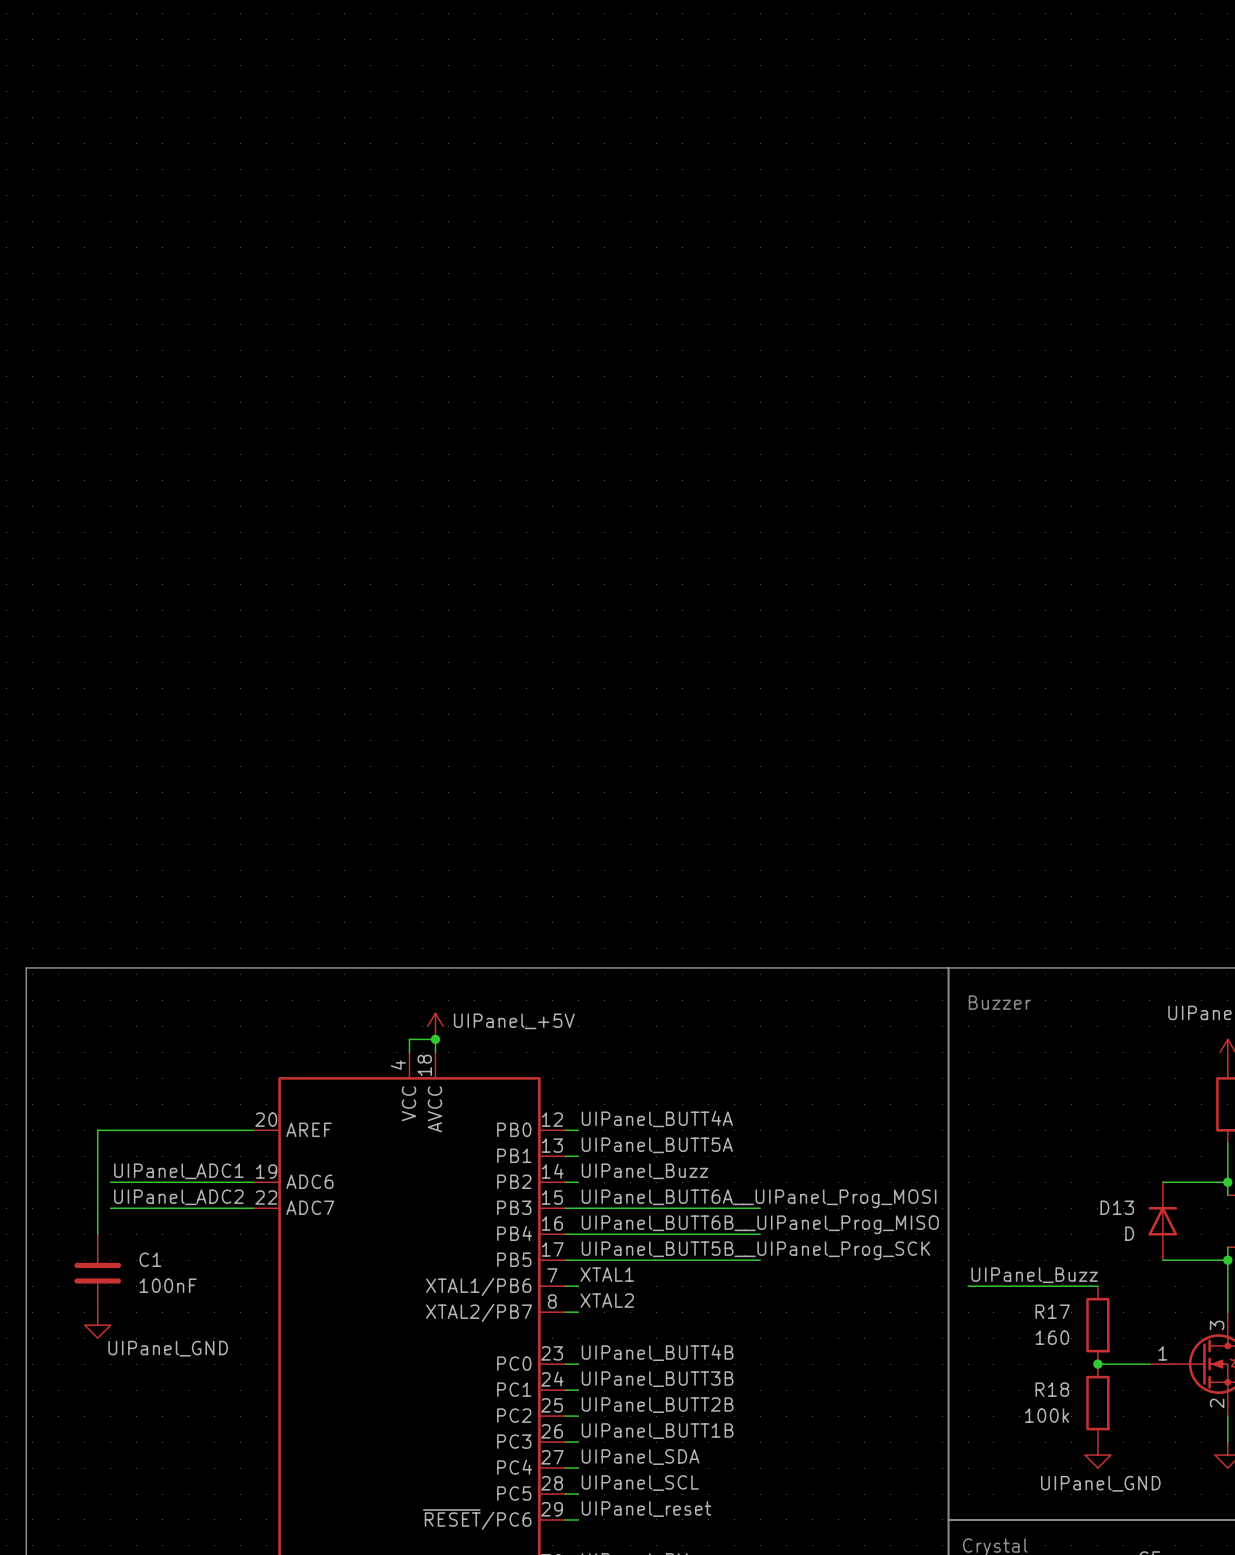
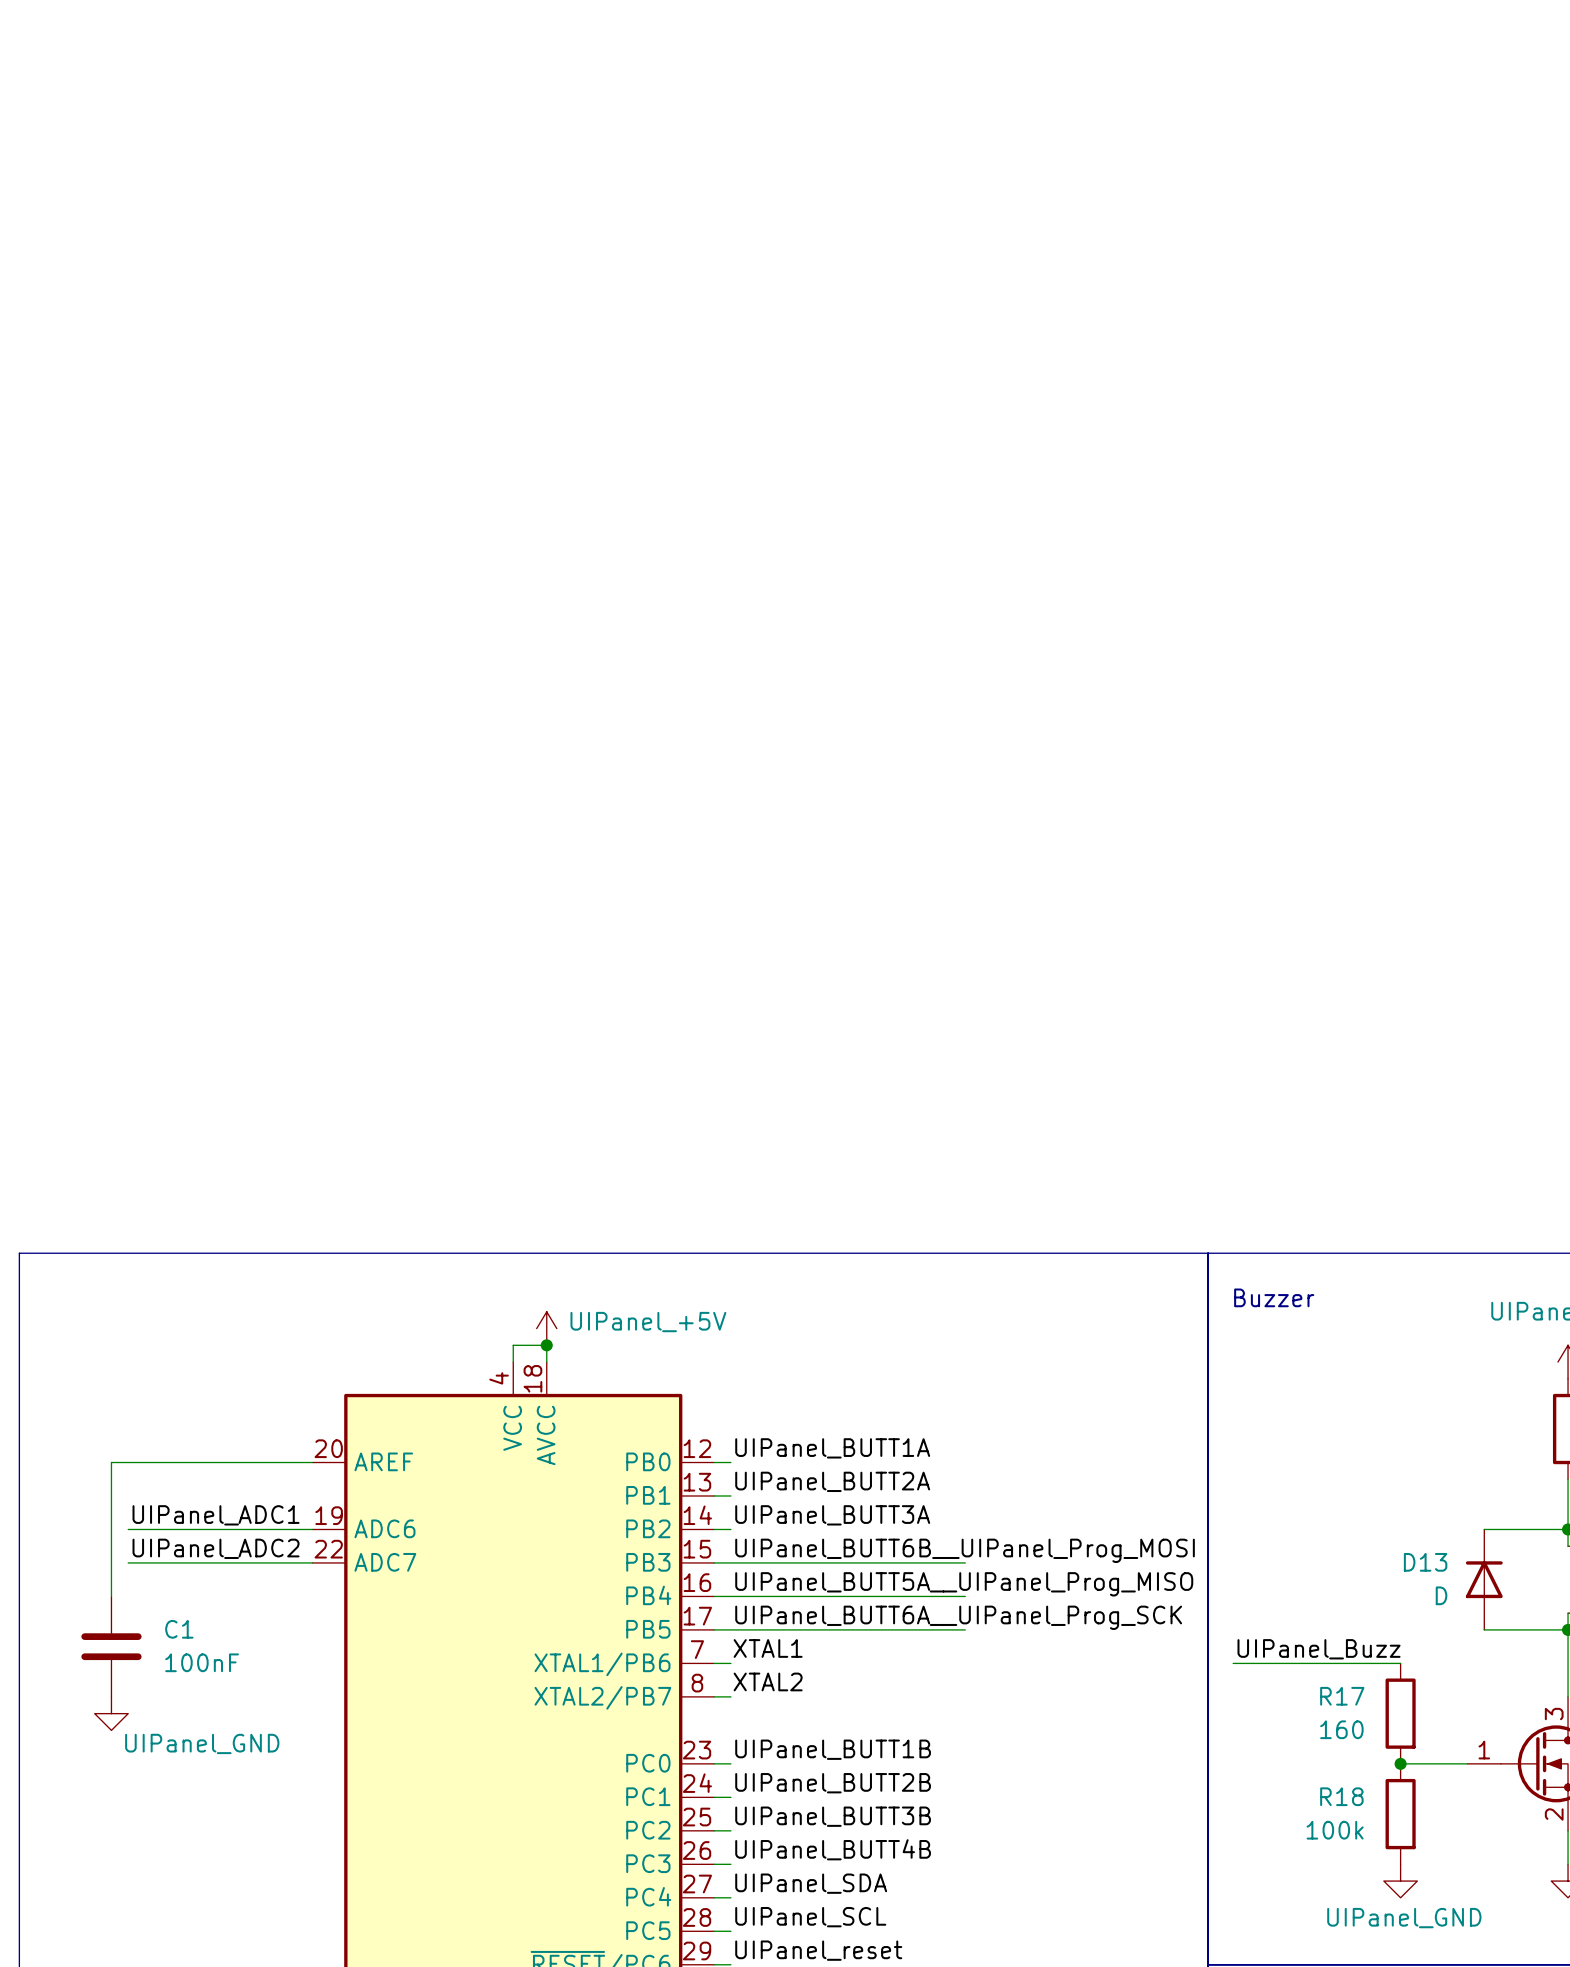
label: UIPanel_BUTT4A (657, 1119) -> UIPanel_BUTT1A (832, 1448)
label: UIPanel_BUTT5A (657, 1145) -> UIPanel_BUTT2A (832, 1481)
label: UIPanel_Buzz (644, 1171) -> UIPanel_BUTT3A (832, 1515)
label: UIPanel_BUTT6A__UIPanel_Prog_MOSI (759, 1198) -> UIPanel_BUTT6B__UIPanel_Prog_MOSI (965, 1550)
label: UIPanel_BUTT6B__UIPanel_Prog_MISO (760, 1224) -> UIPanel_BUTT5A__UIPanel_Prog_MISO (964, 1584)
label: UIPanel_BUTT5B__UIPanel_Prog_SCK (755, 1250) -> UIPanel_BUTT6A__UIPanel_Prog_SCK (958, 1617)
label: UIPanel_BUTT4B (657, 1352) -> UIPanel_BUTT1B (833, 1749)
label: UIPanel_BUTT3B (657, 1379) -> UIPanel_BUTT2B (833, 1783)
label: UIPanel_BUTT2B (657, 1405) -> UIPanel_BUTT3B (833, 1816)
label: UIPanel_BUTT1B (657, 1431) -> UIPanel_BUTT4B (833, 1849)

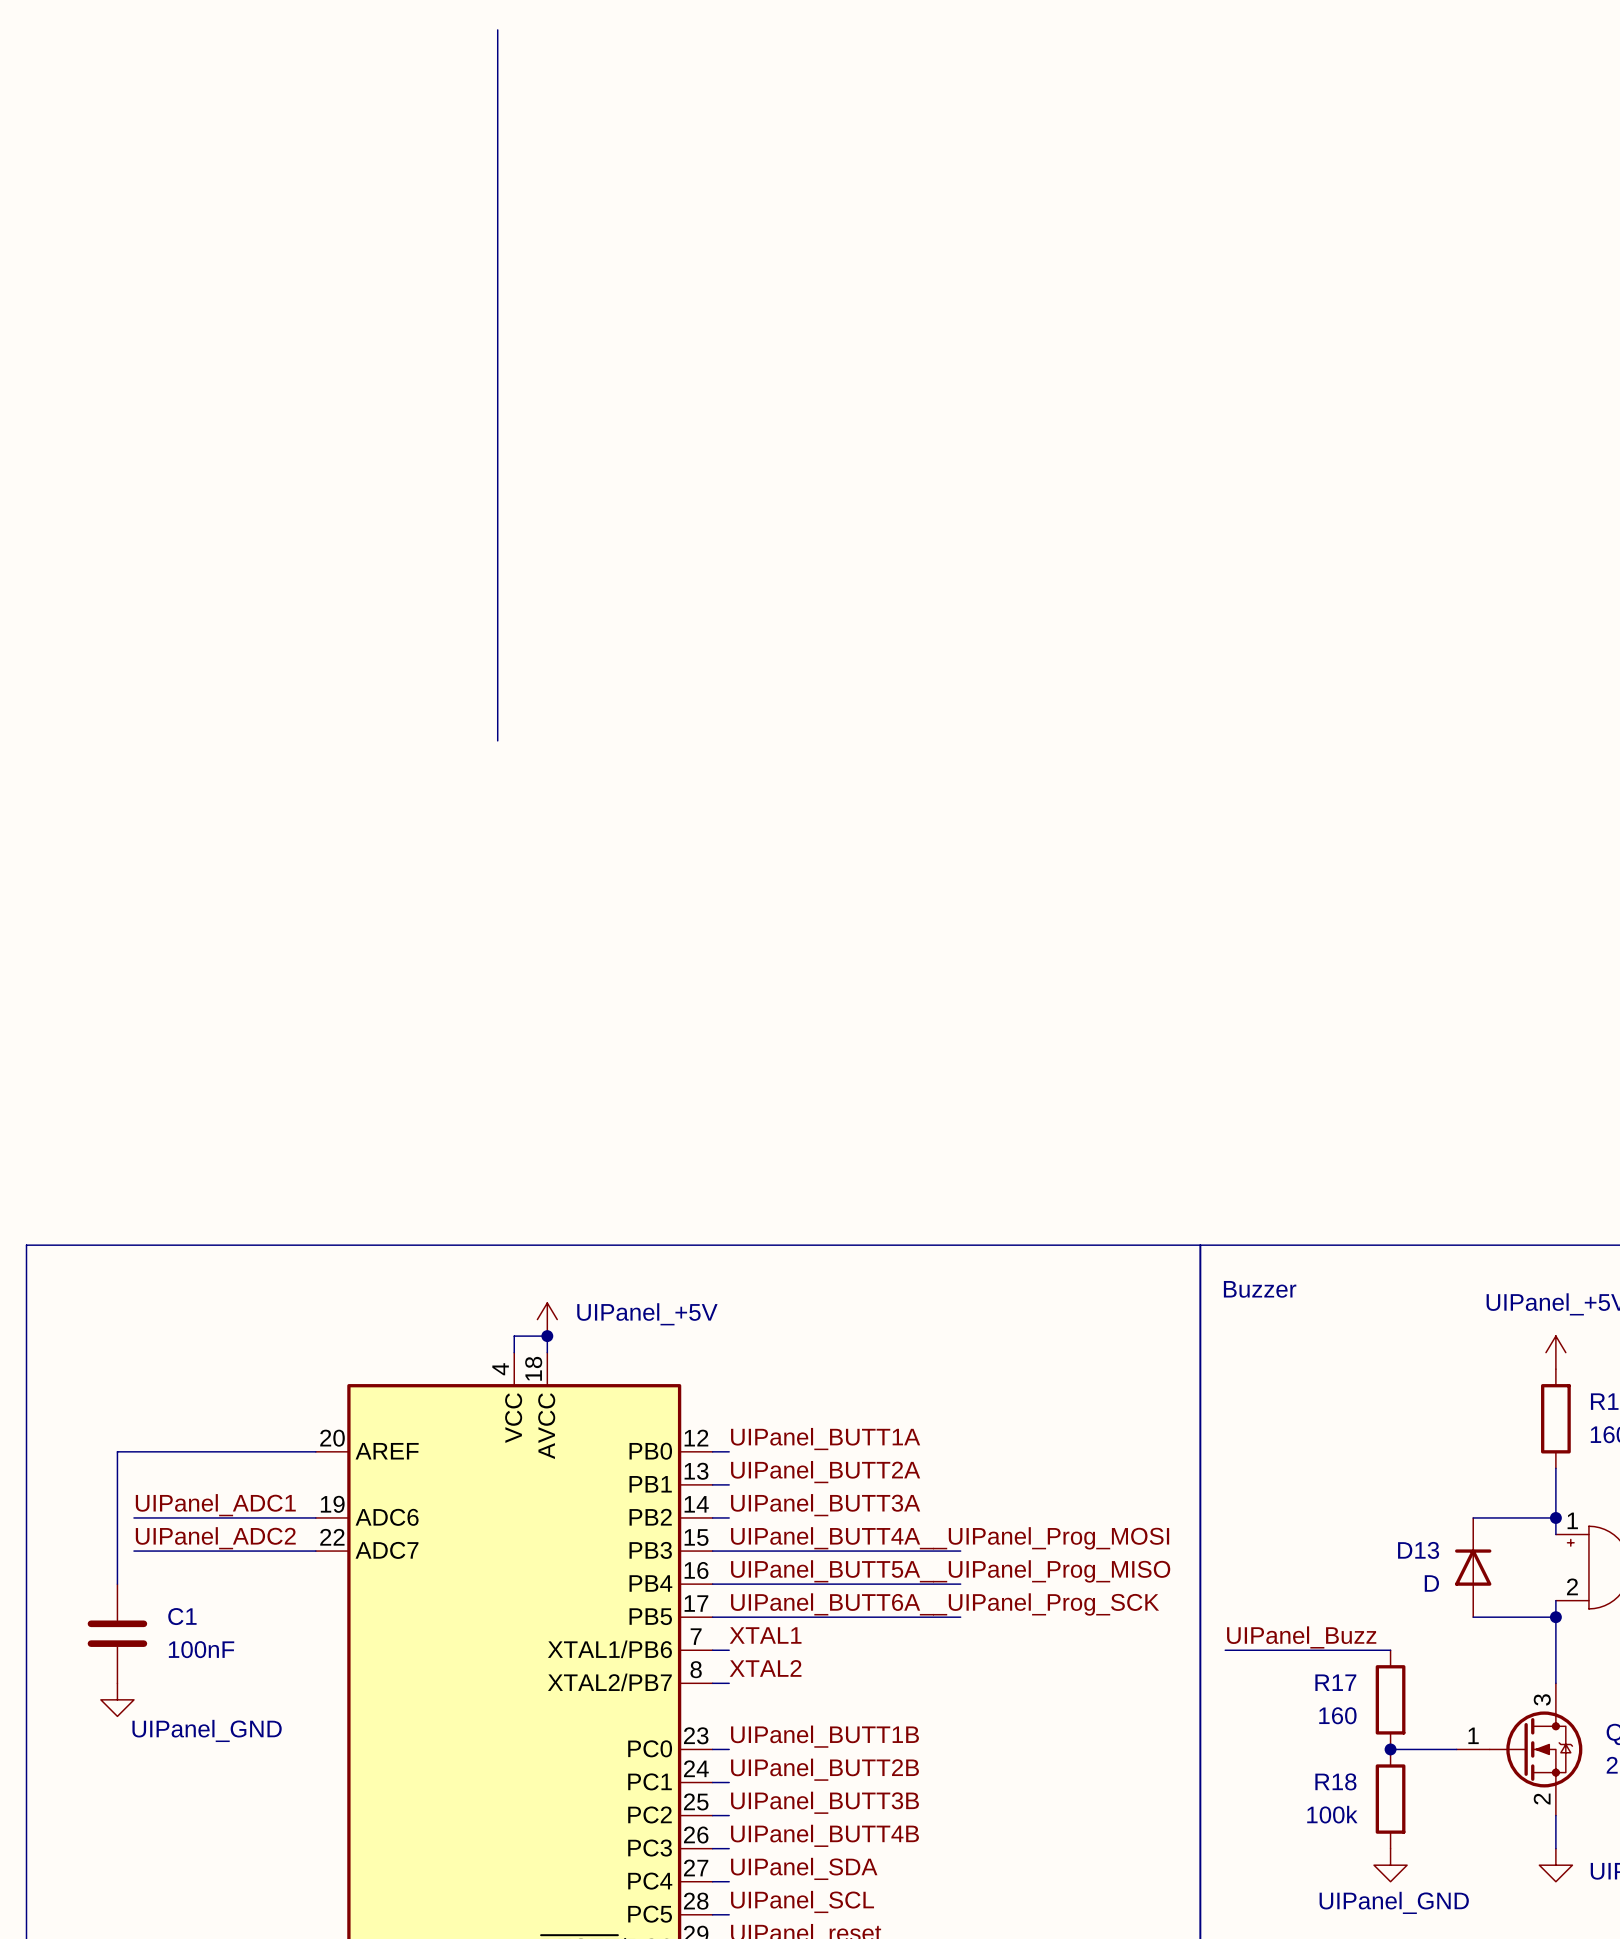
line: none -> (497, 29) (497, 740)
label: UIPanel_BUTT6B__UIPanel_Prog_MOSI (965, 1550) -> UIPanel_BUTT4A__UIPanel_Prog_MOSI (950, 1538)

